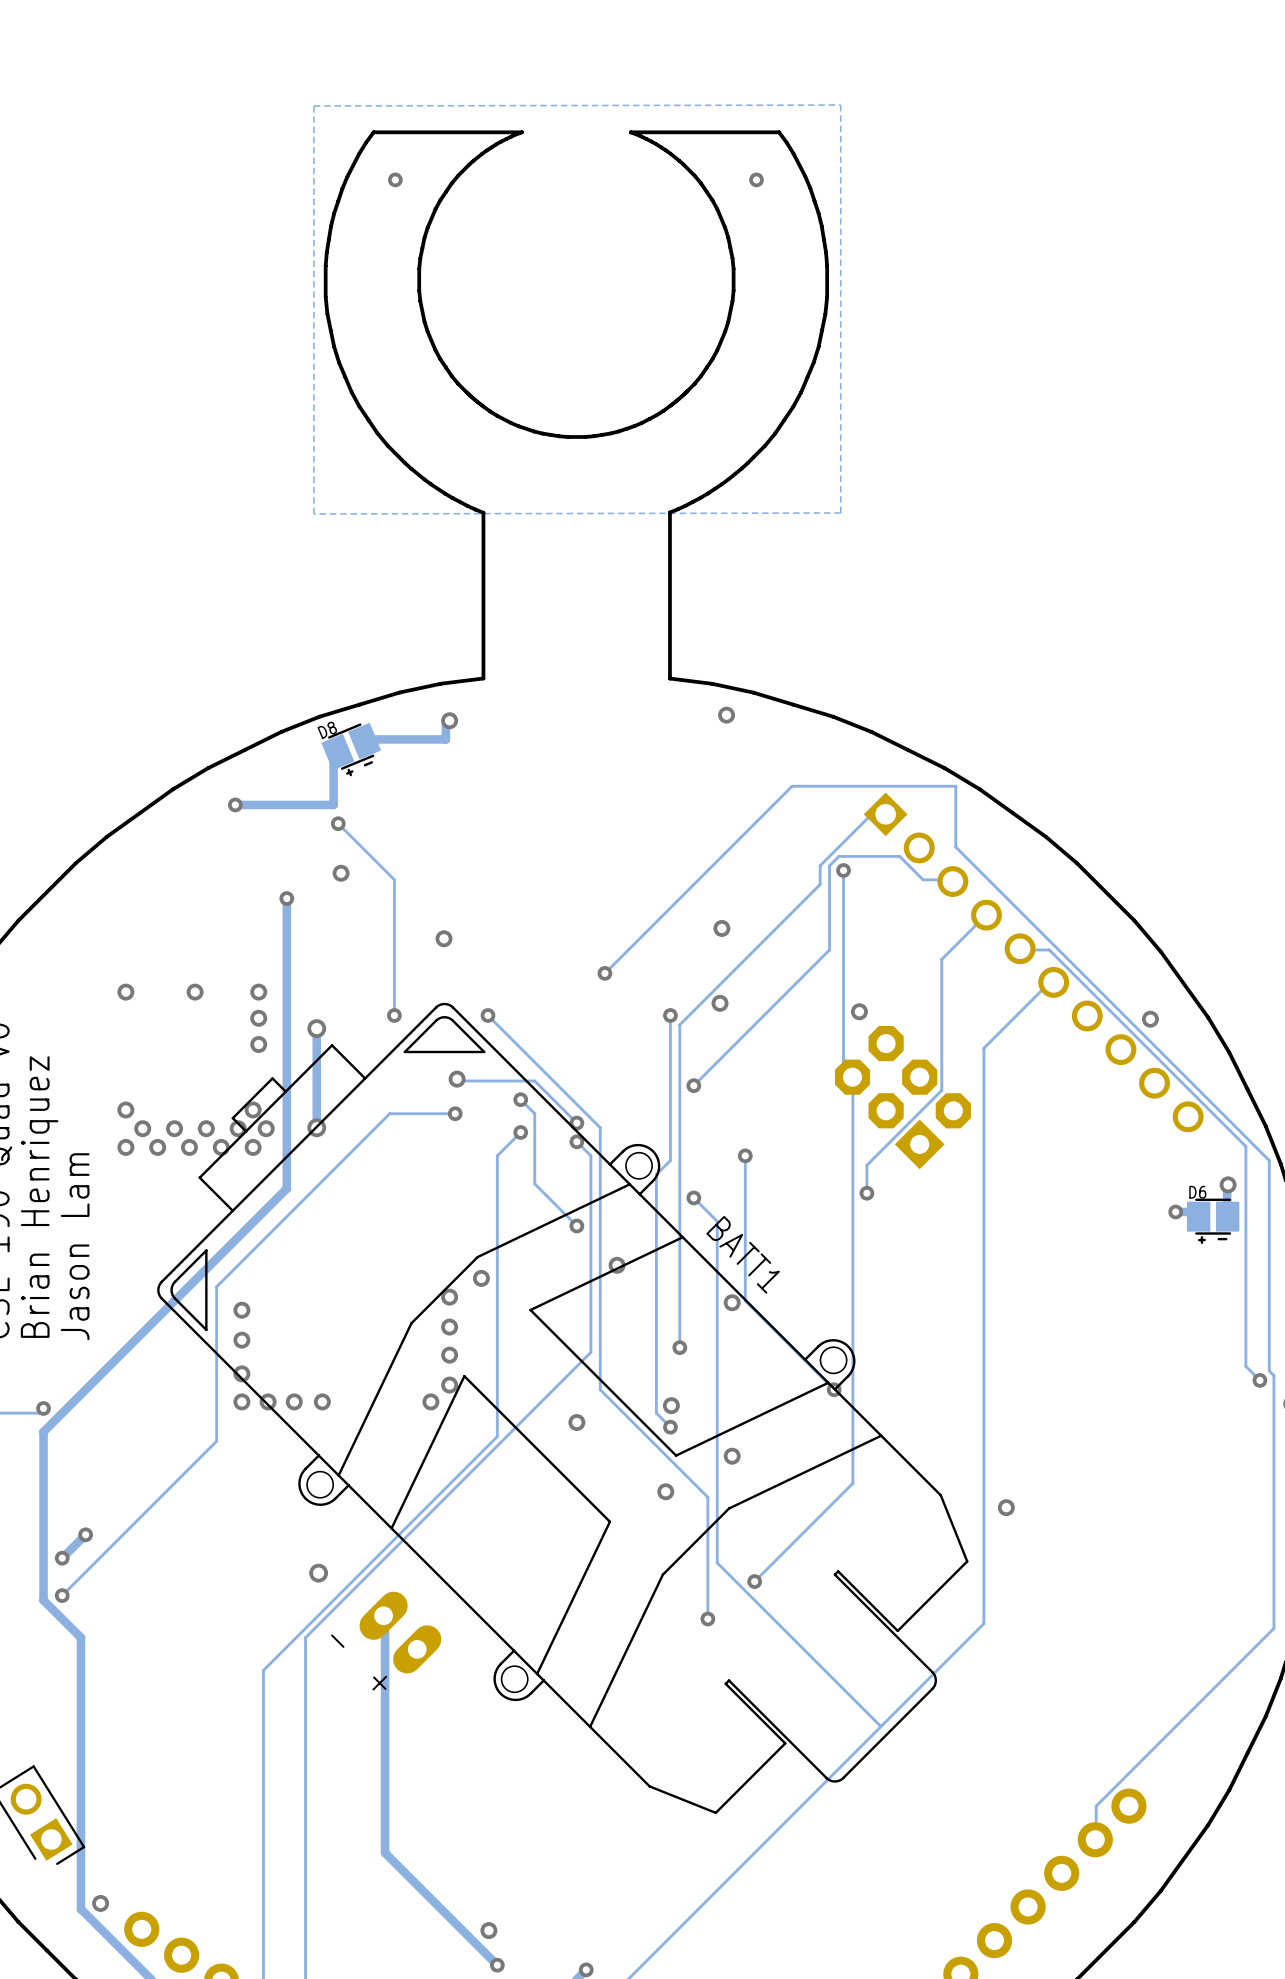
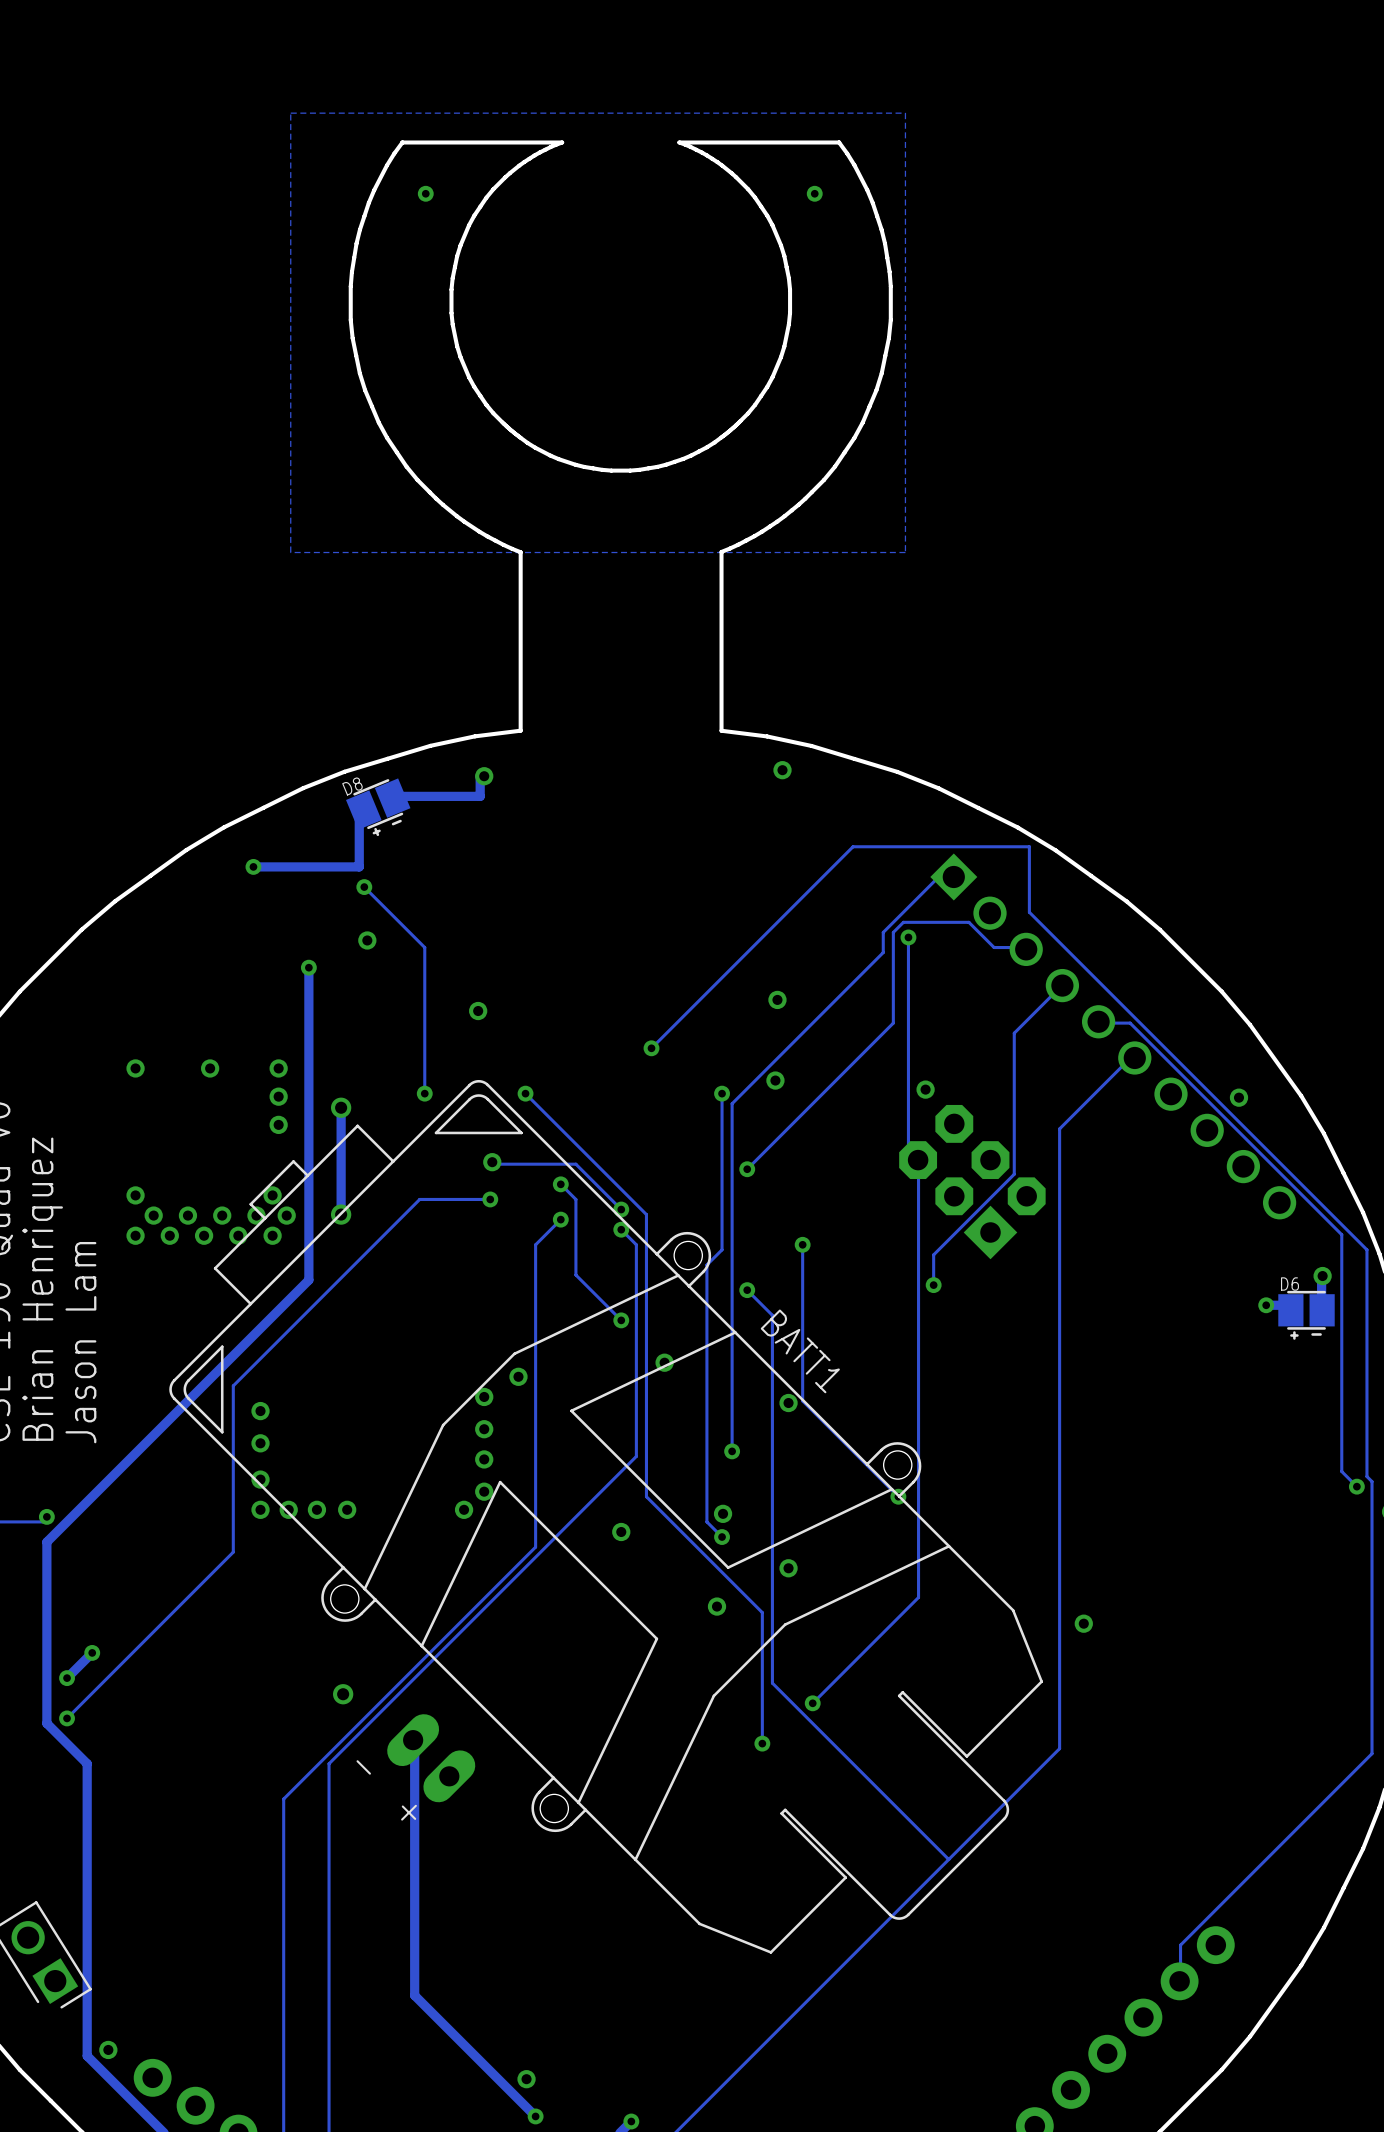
zone outline: (840, 105) (313, 106) (313, 513) (840, 513) -> (905, 113) (290, 113) (290, 552) (905, 552)

